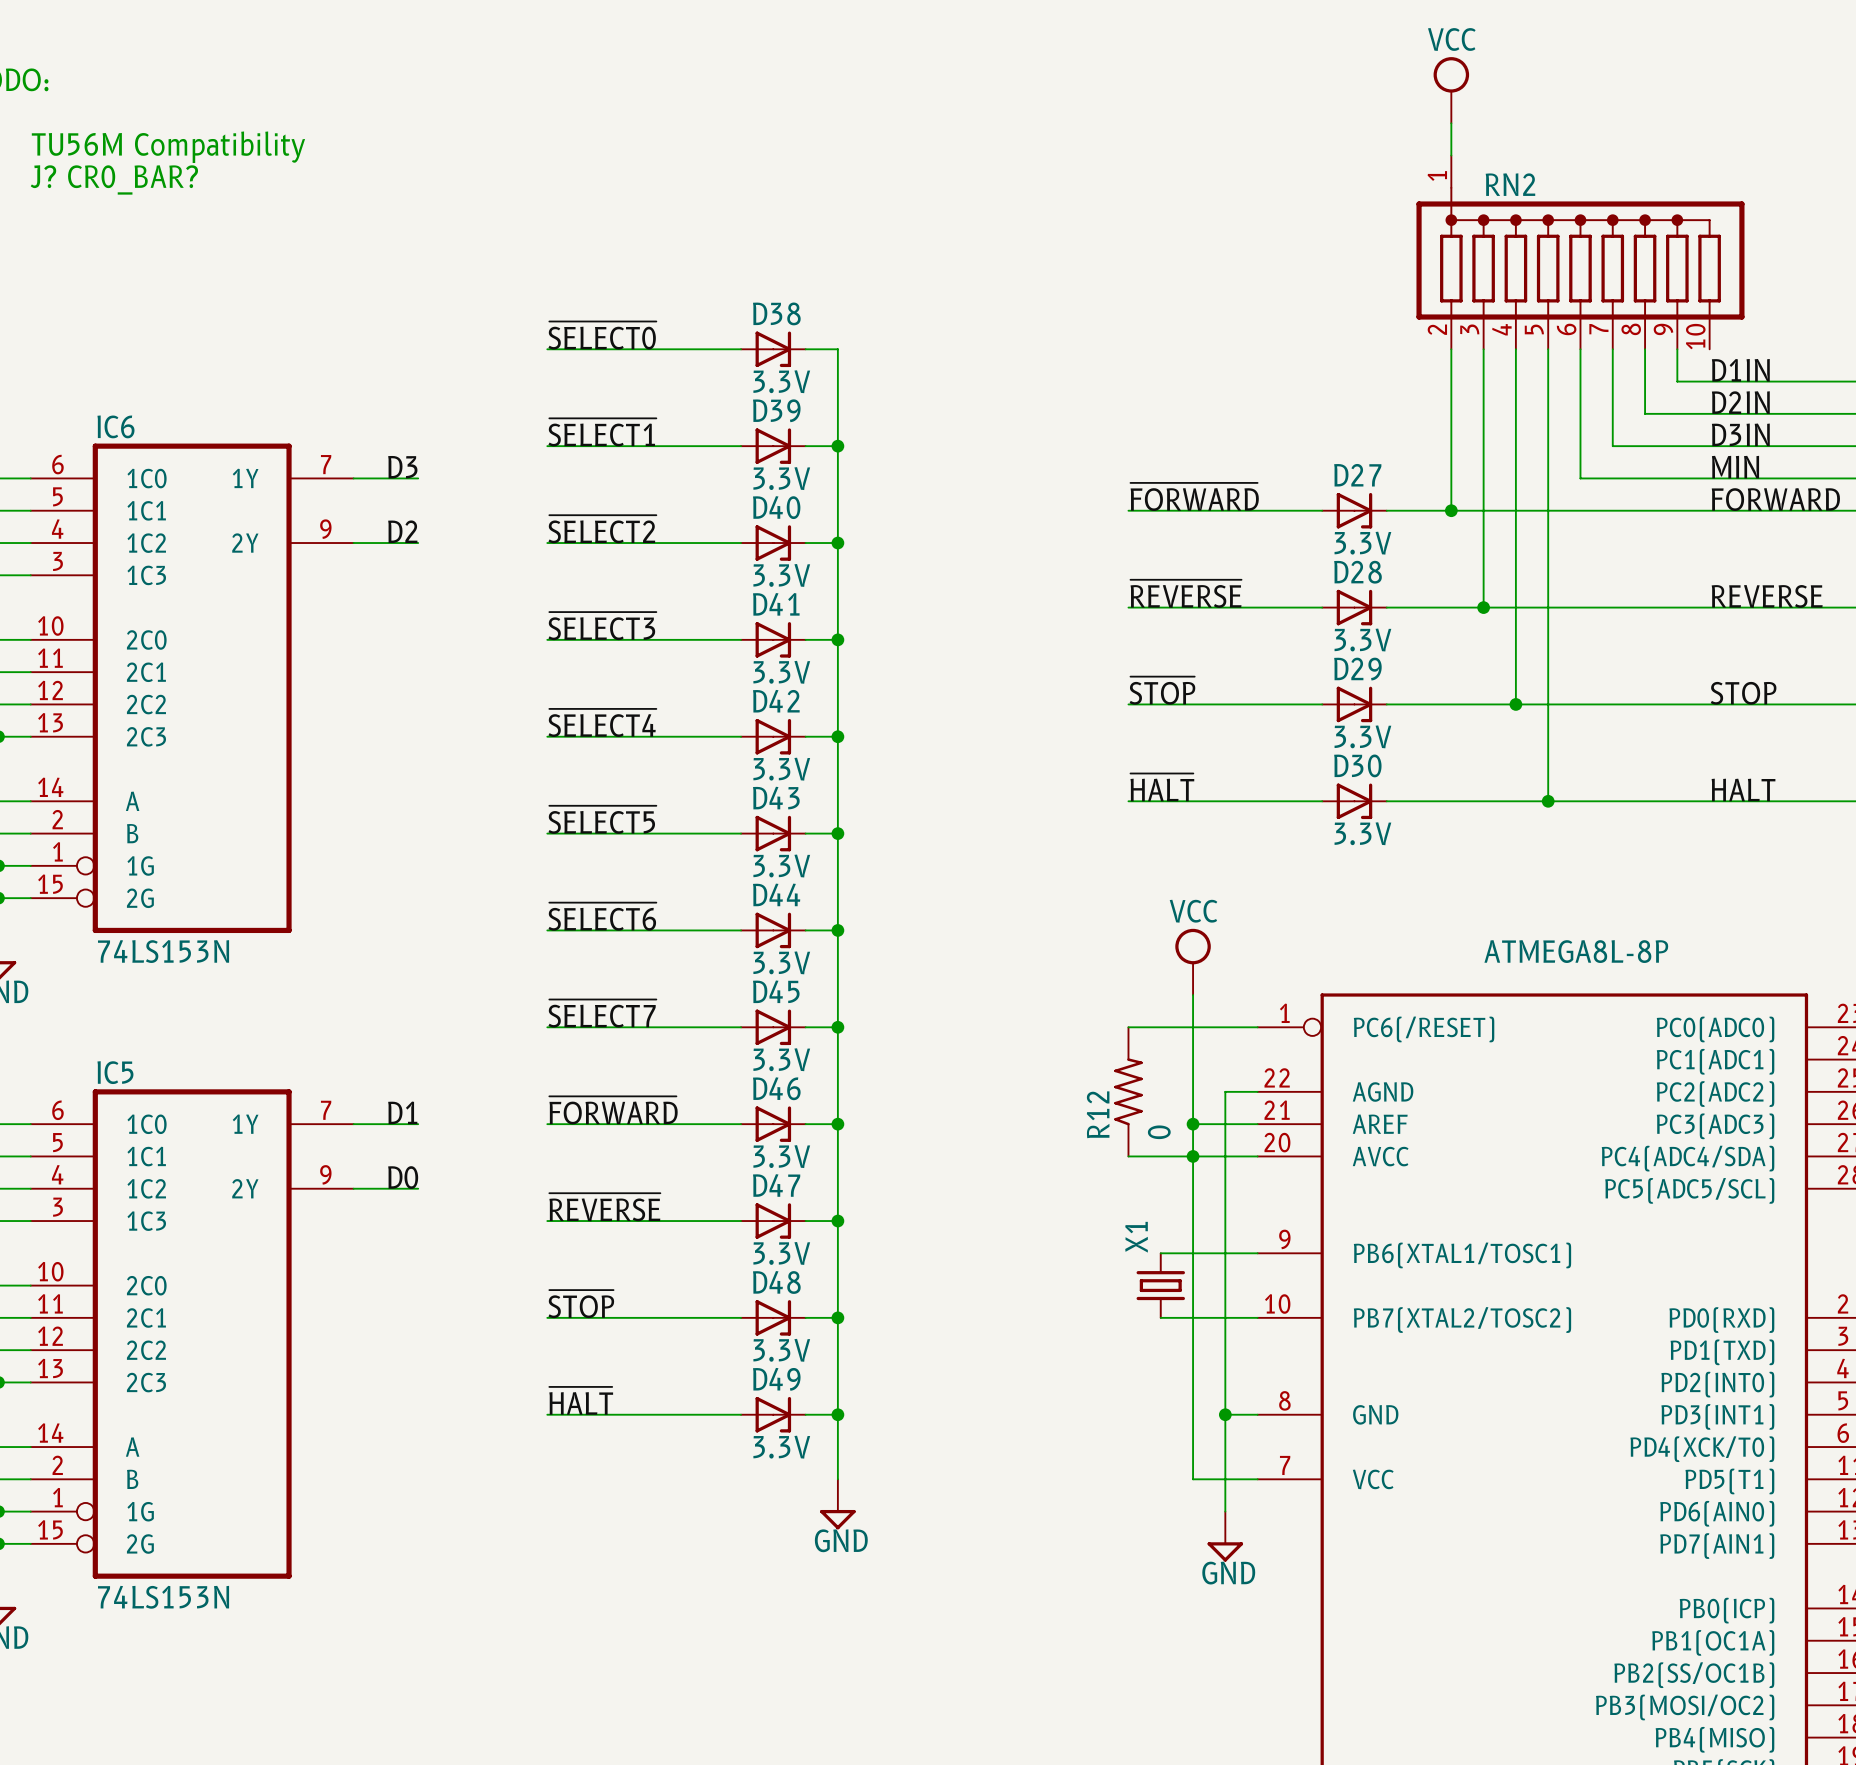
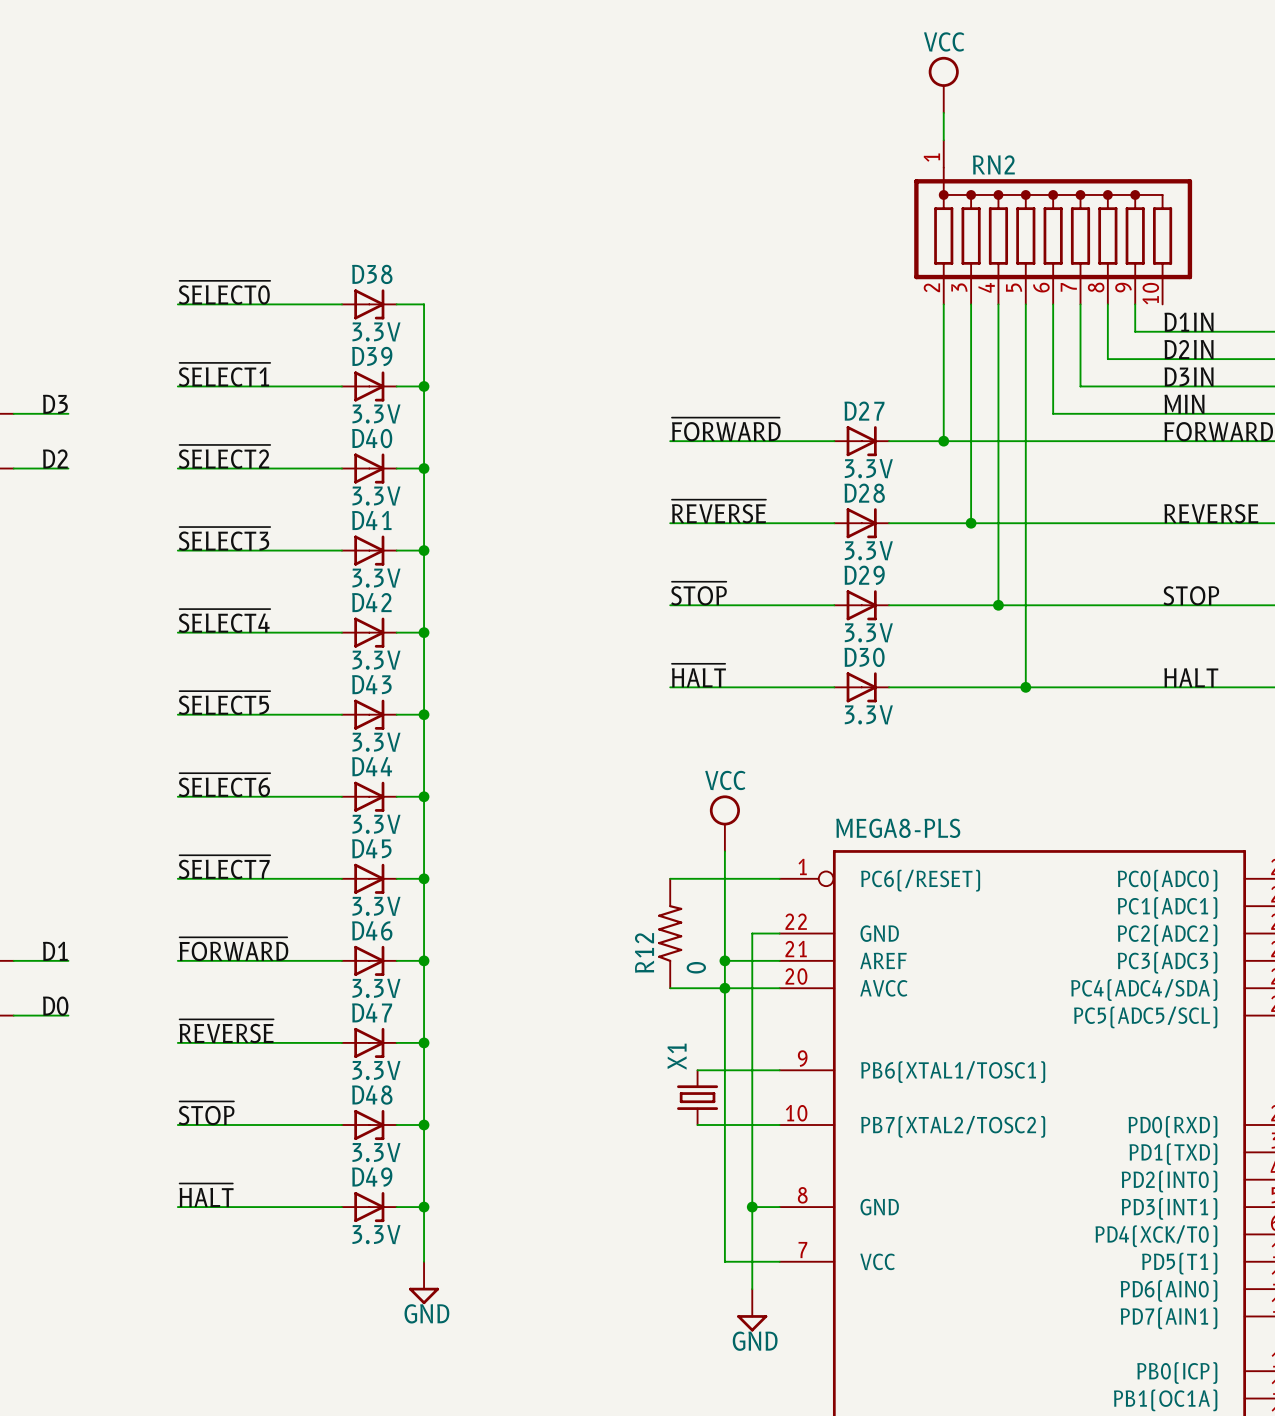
part value: ATMEGA8L-8P (1576, 951) -> MEGA8-PLS (898, 828)
part pin name: AGND (1383, 1091) -> GND (879, 933)

